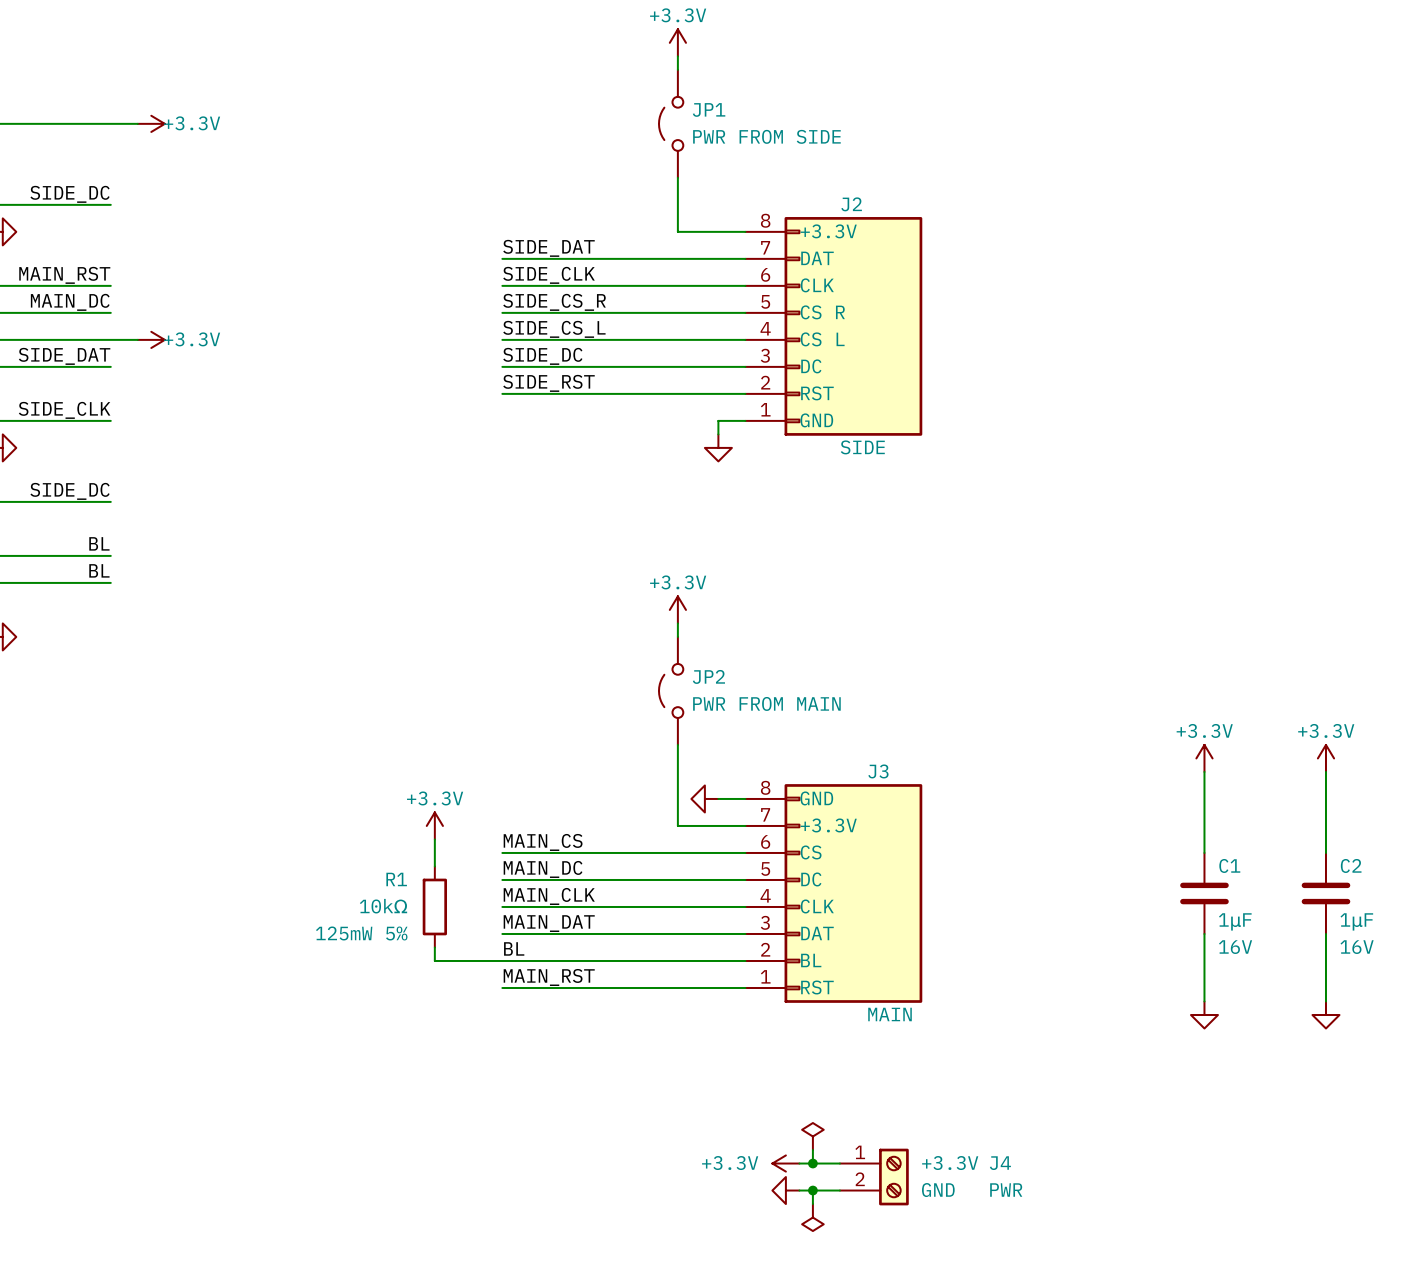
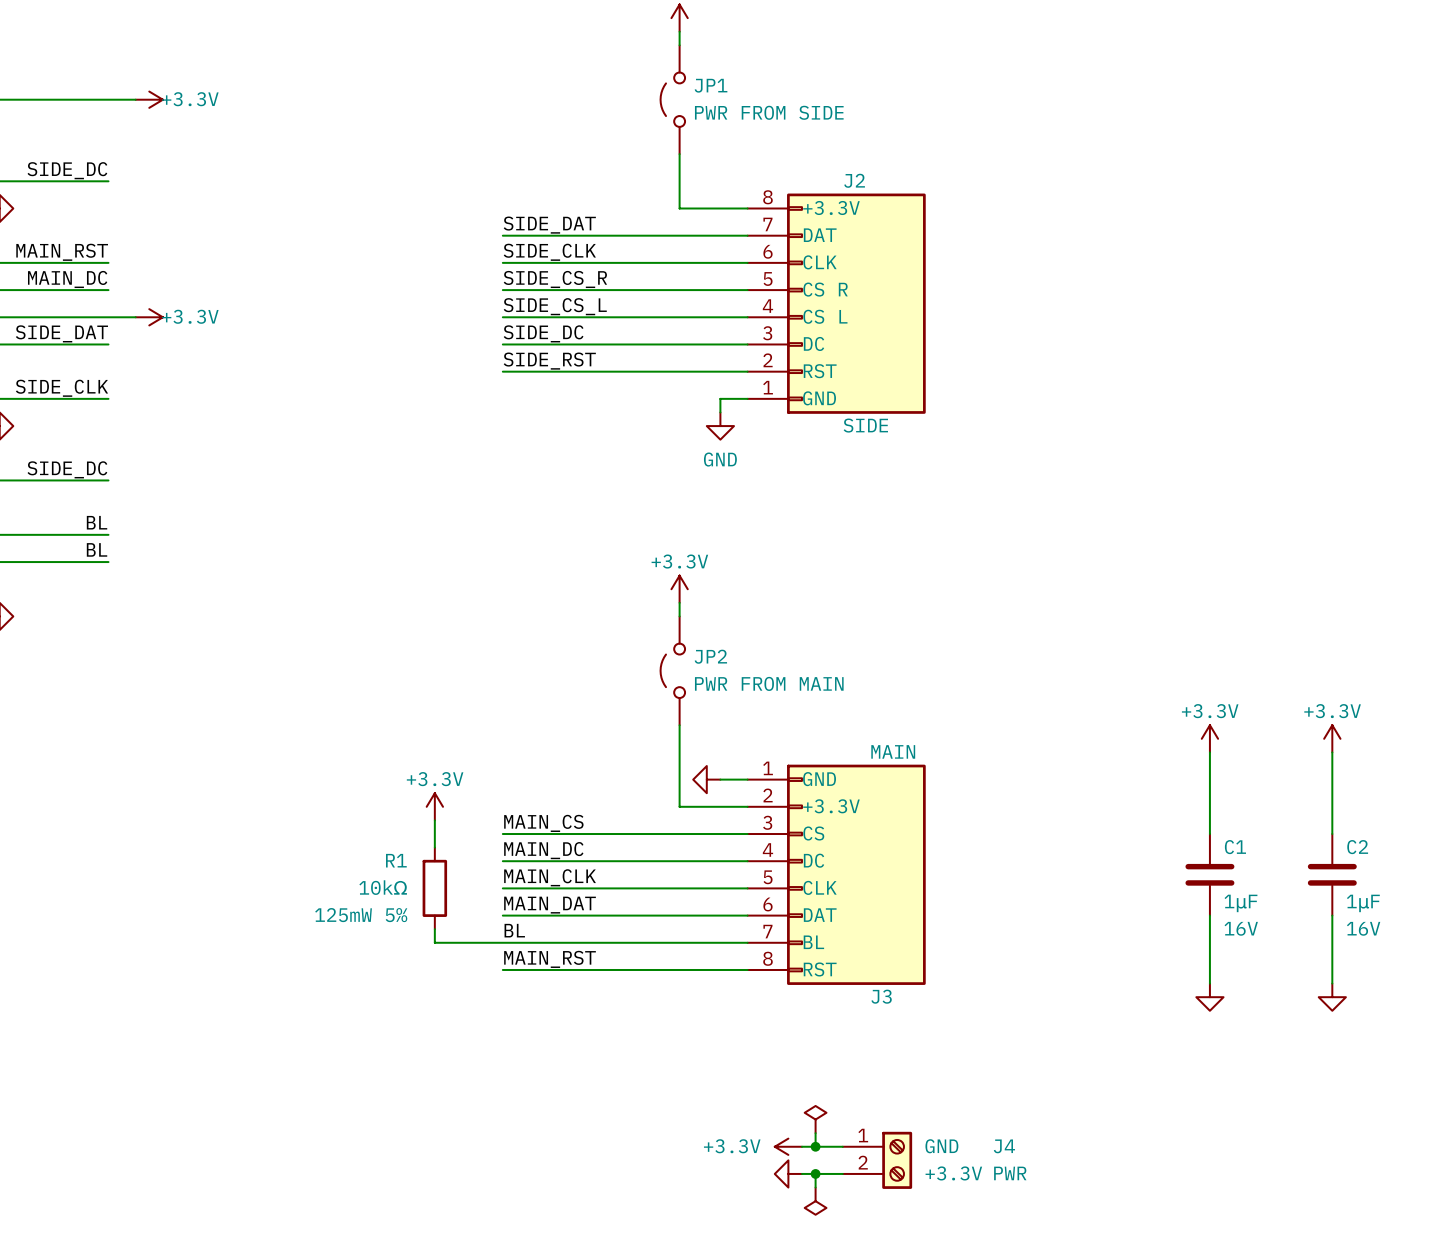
power symbol text: none -> GND (720, 459)
J3 flip: as is (853, 893) -> up-down (856, 874)
J4 text: +3.3V (950, 1163) -> GND (941, 1146)
J4 text: GND (938, 1190) -> +3.3V (953, 1173)

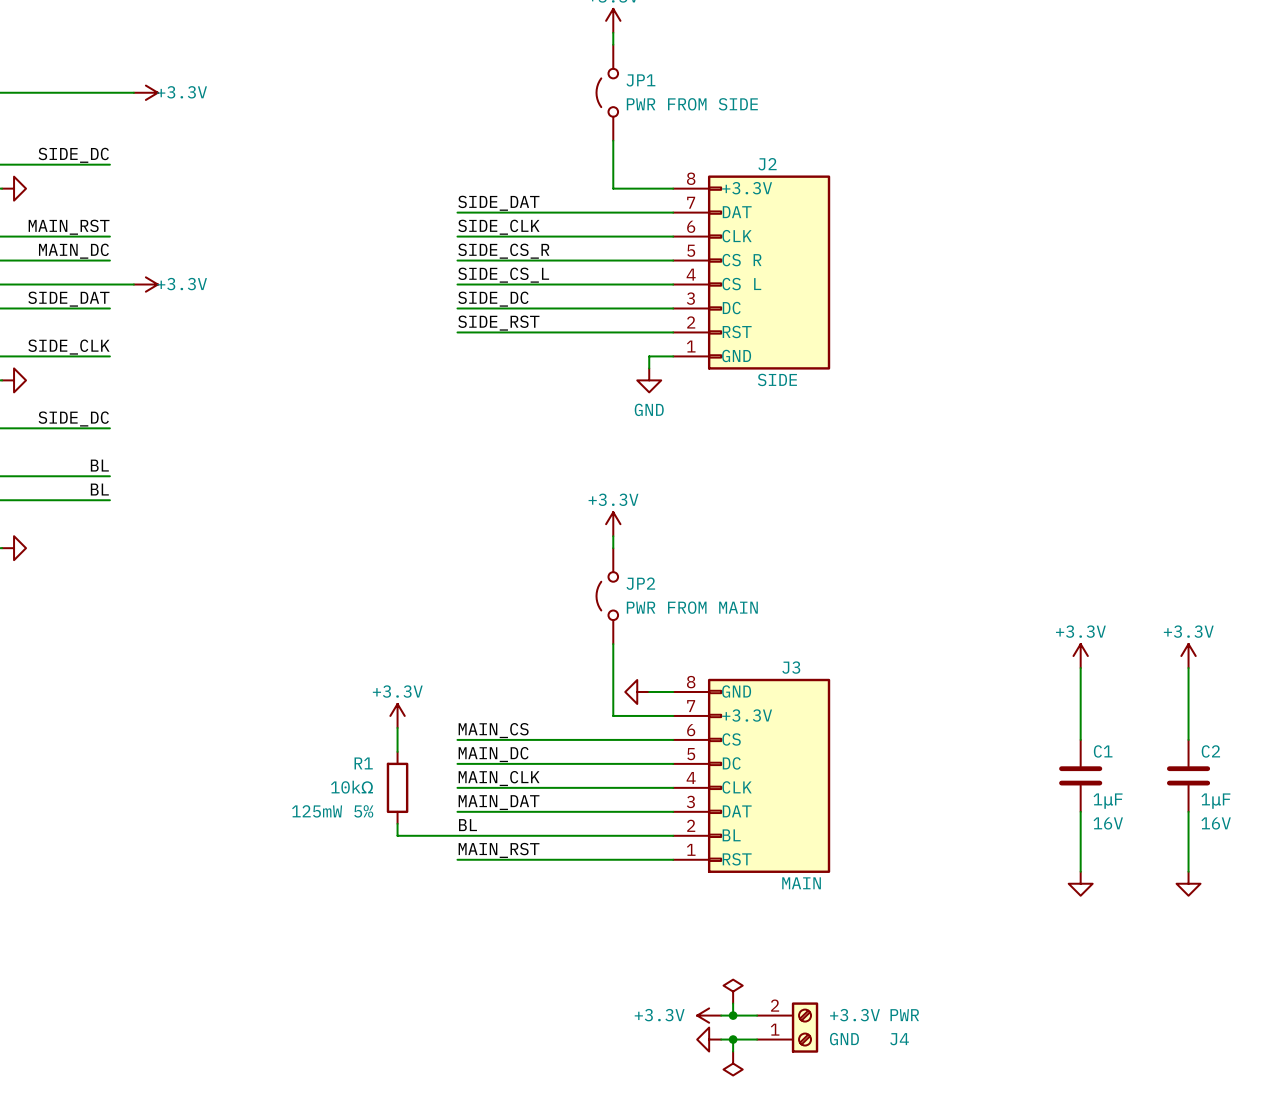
J3 flip: as is (856, 874) -> up-down (769, 775)
J4 flip: as is (897, 1160) -> up-down (805, 1027)

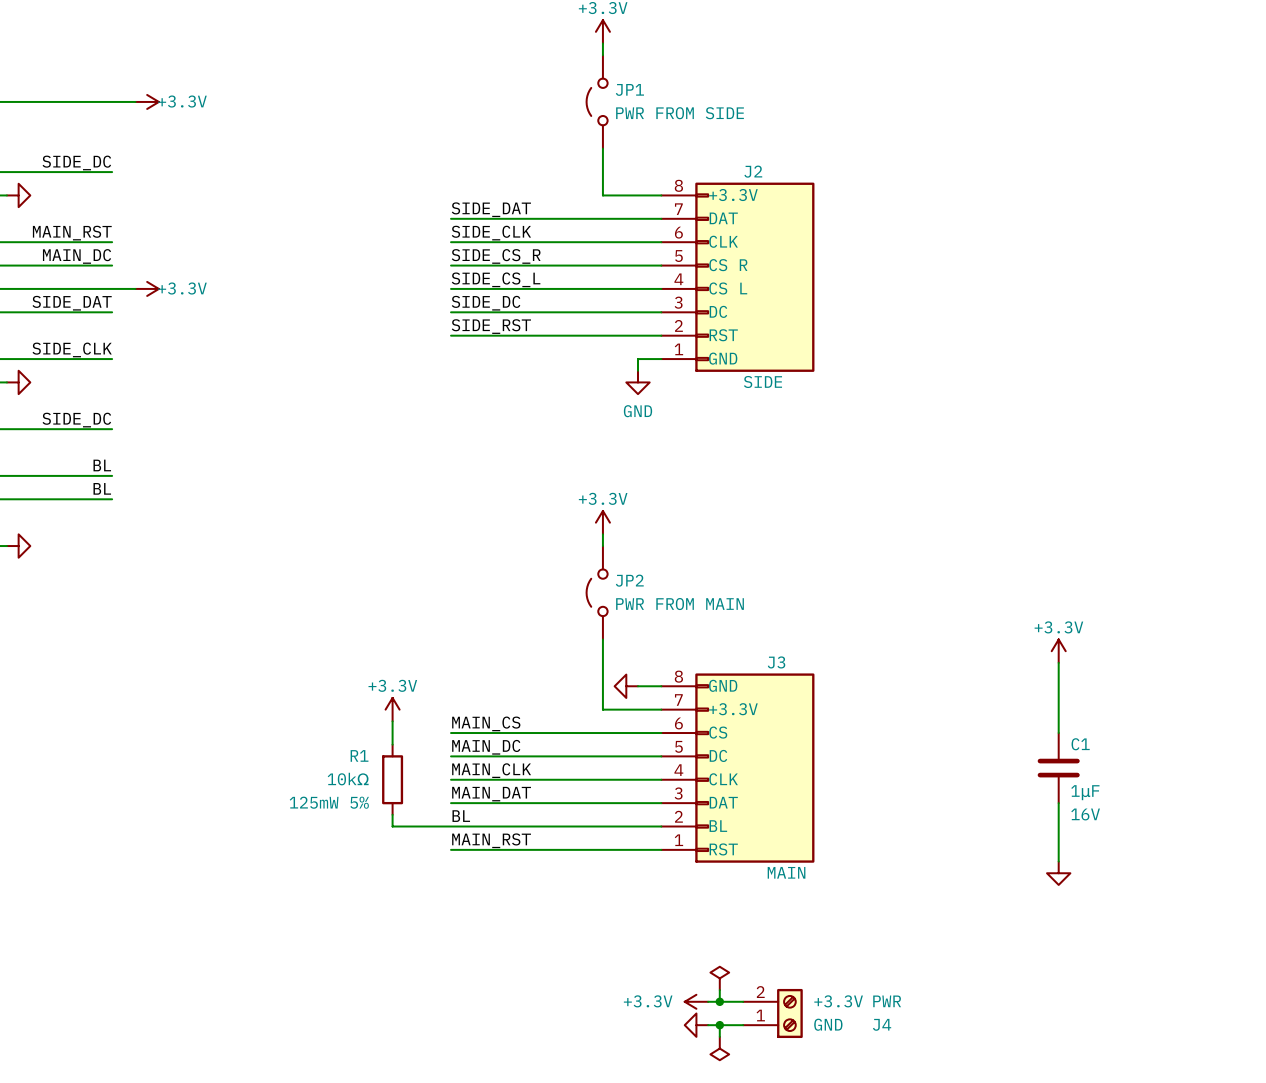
power symbol: +3.3V (1188, 656) -> none
wire: (1188, 668) (1188, 739) -> none
C2: 1μF (1188, 775) -> none
wire: (1188, 811) (1188, 871) -> none
power symbol: (1188, 883) -> none

